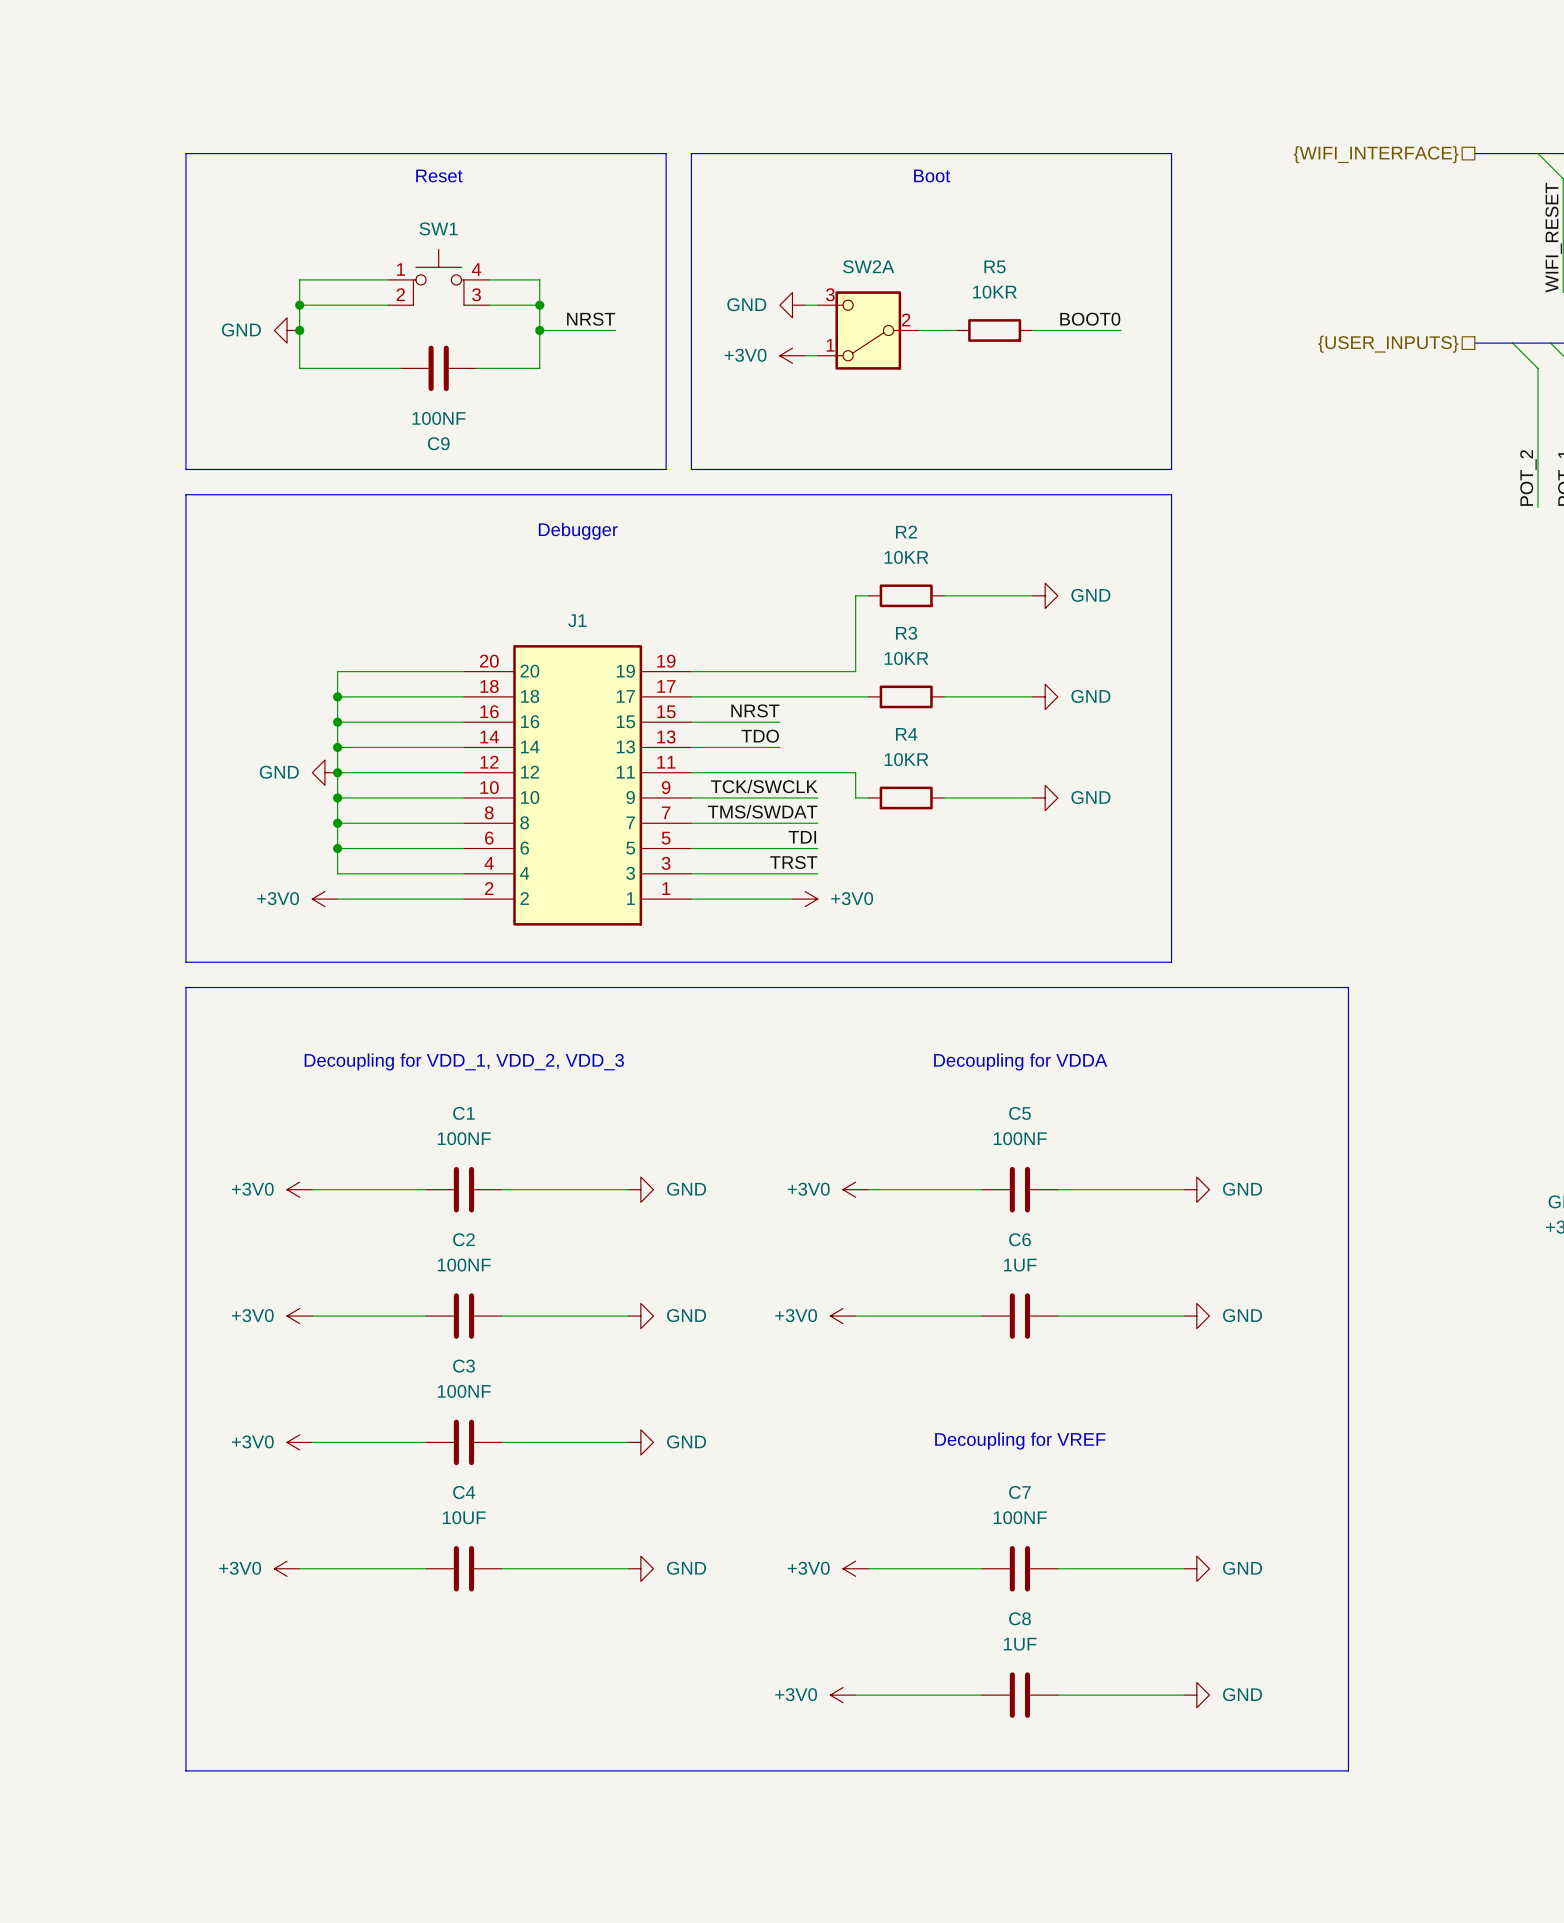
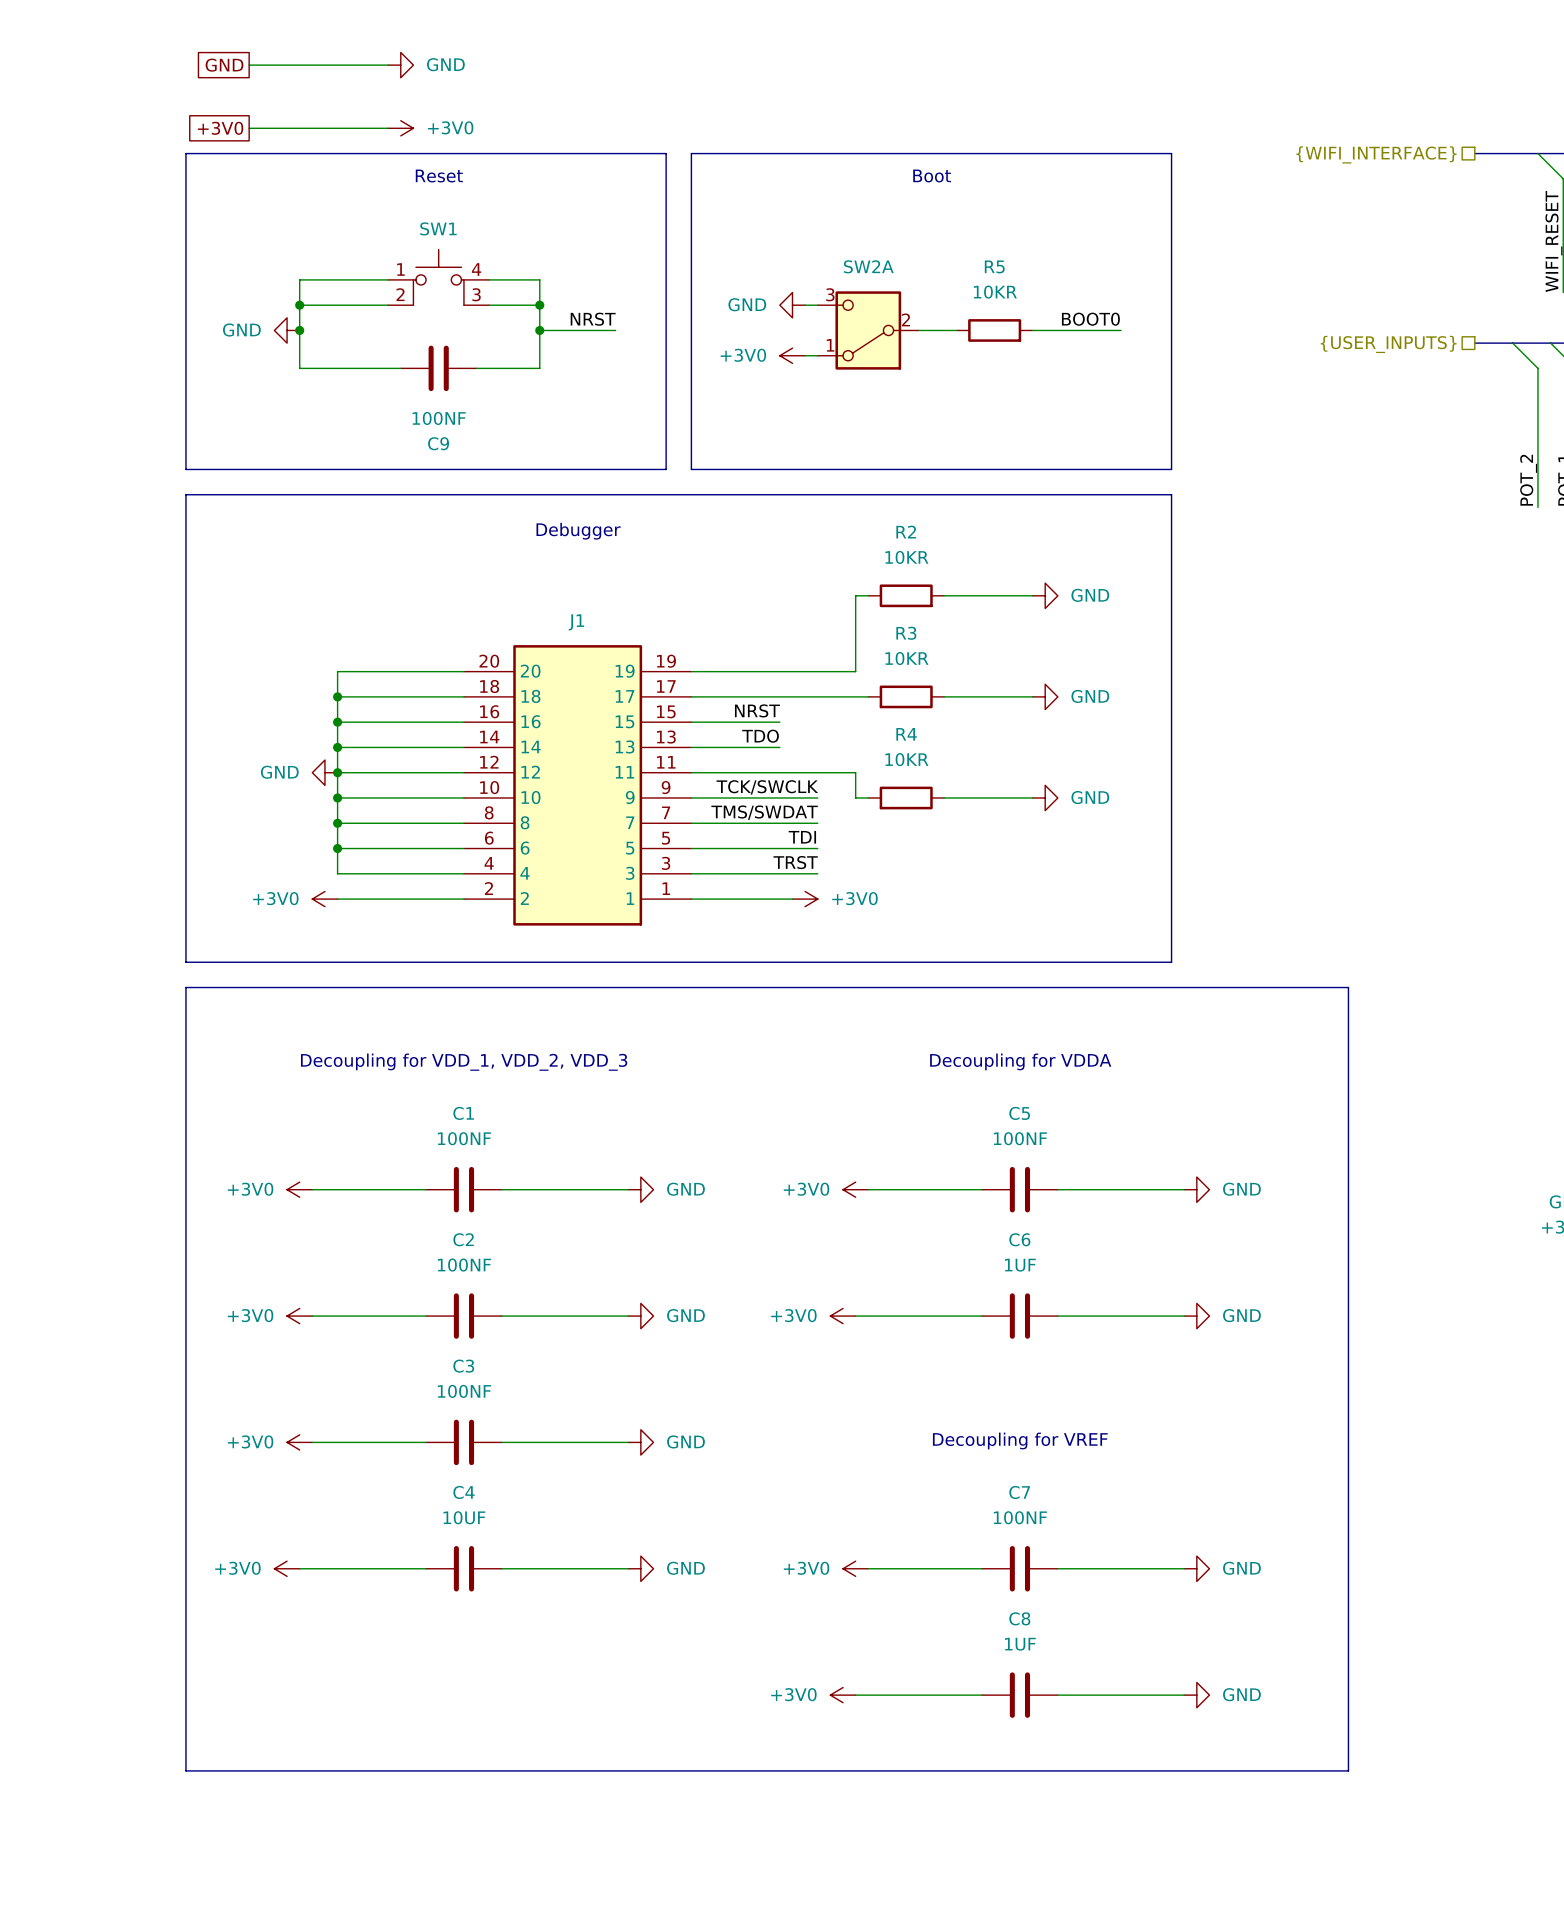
global label: none -> GND (224, 65)
wire: none -> (249, 65) (388, 65)
power symbol: none -> GND (400, 65)
global label: none -> +3V0 (220, 128)
wire: none -> (249, 128) (388, 128)
power symbol: none -> +3V0 (400, 128)

